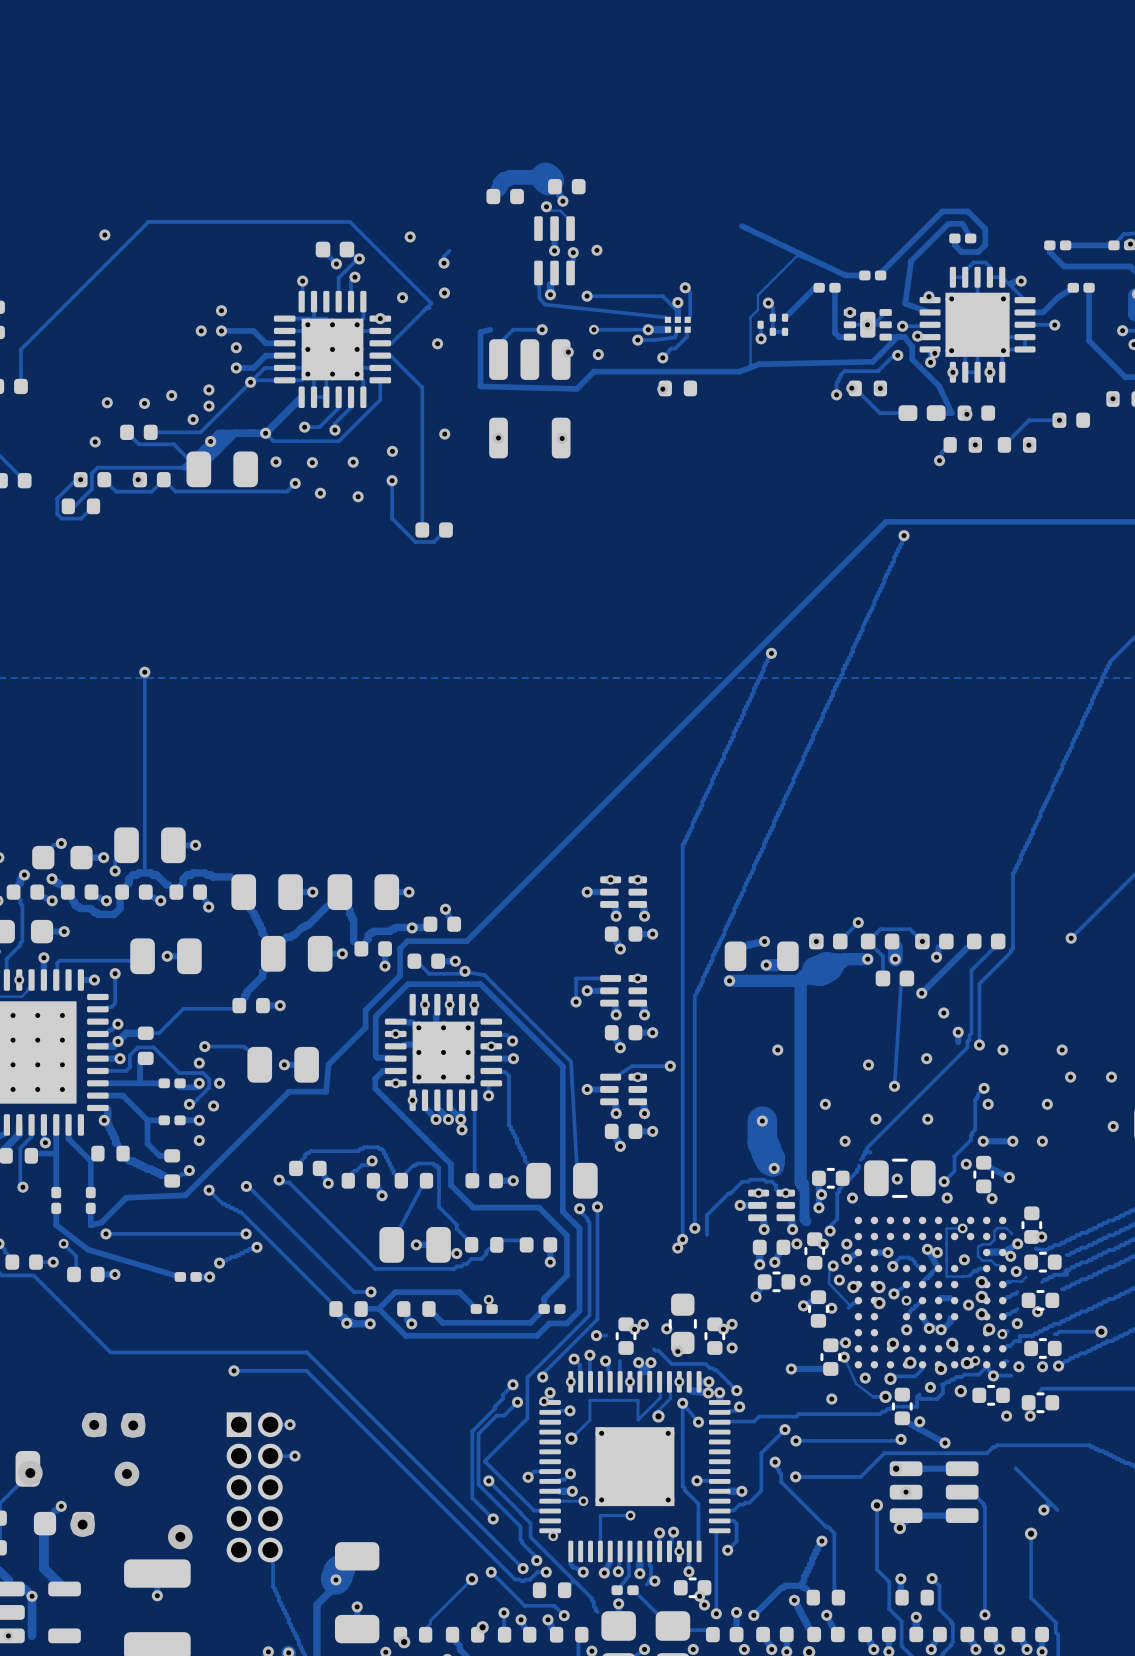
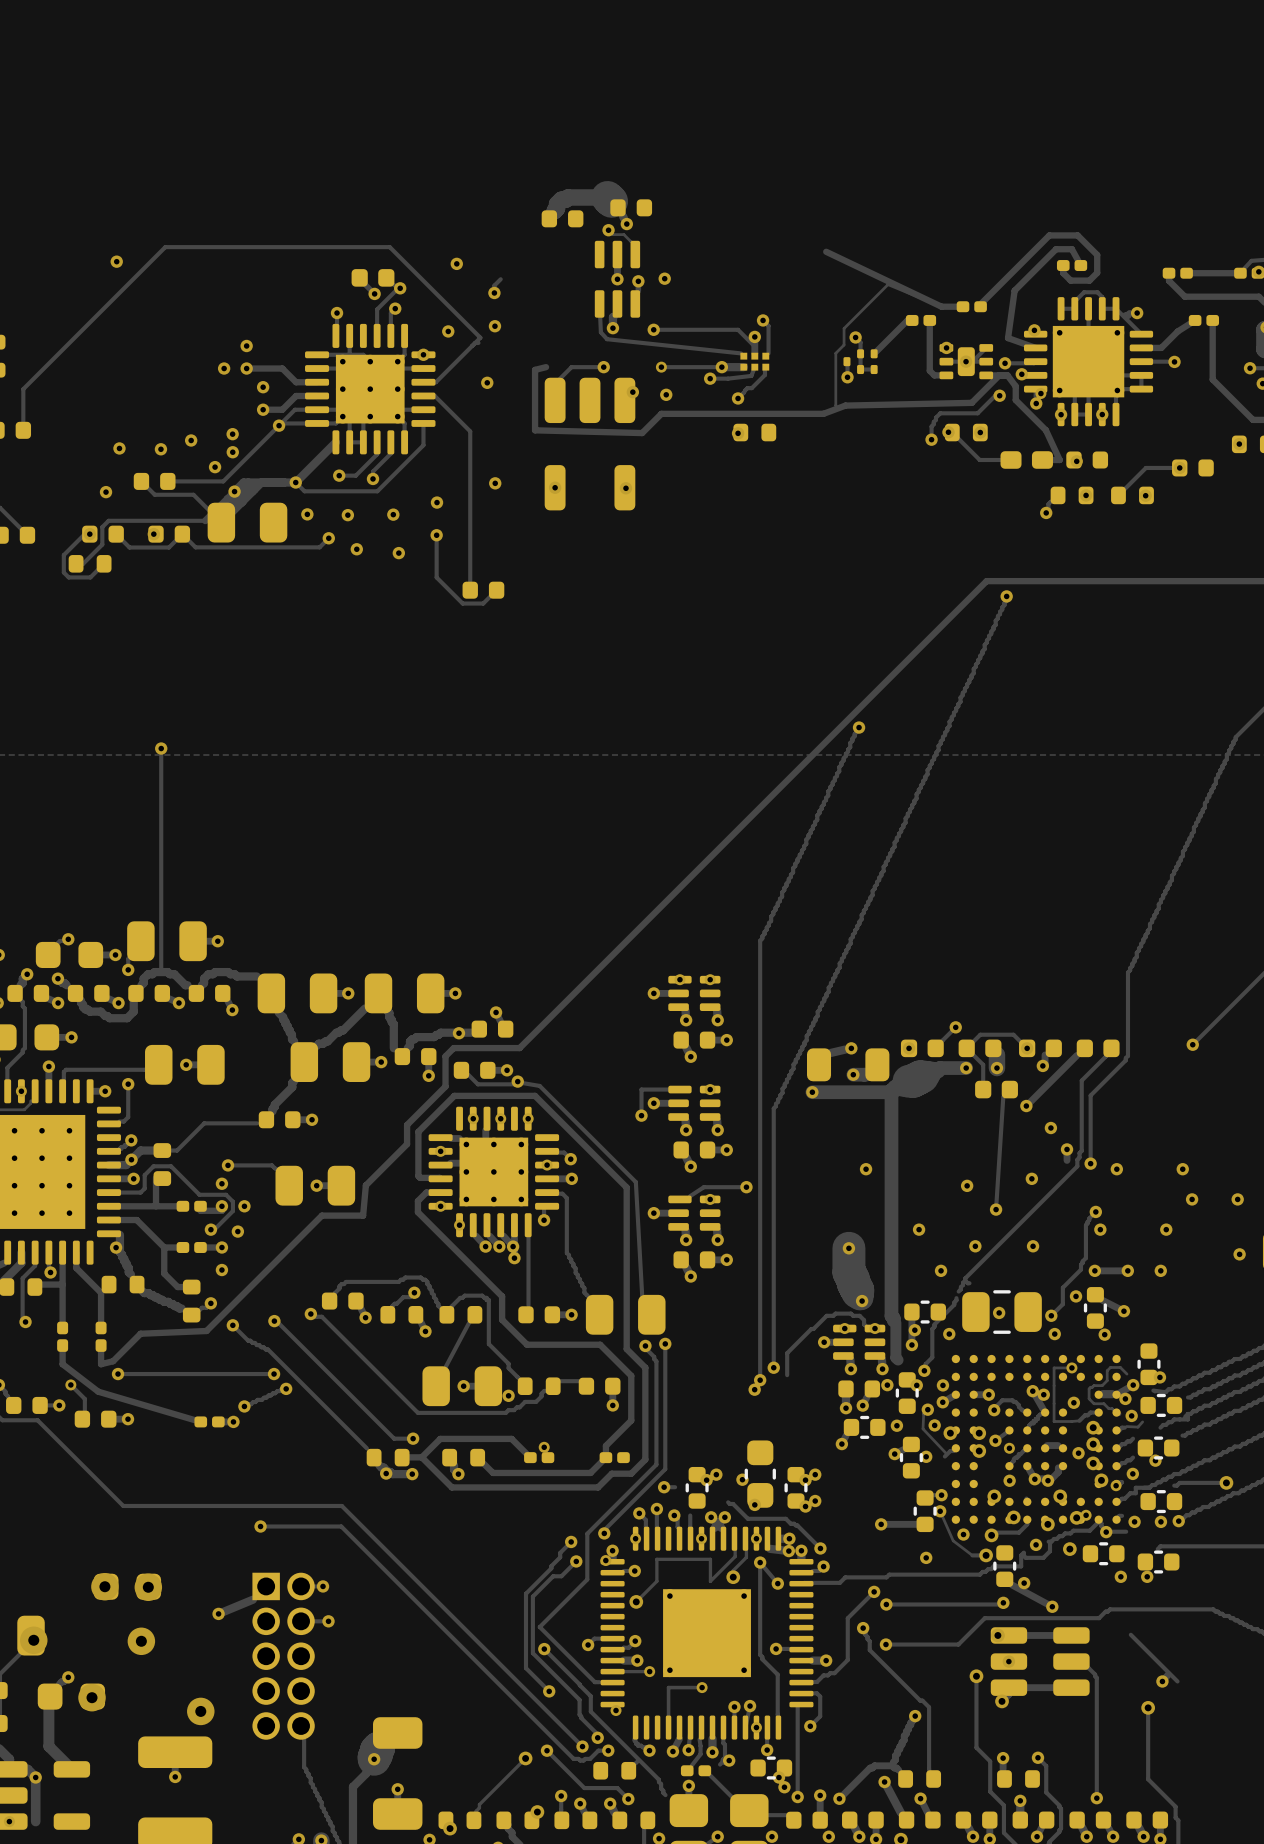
via: none -> (805, 1506)
track: none -> (252, 1599) (218, 1613)
via: none -> (218, 1613)

